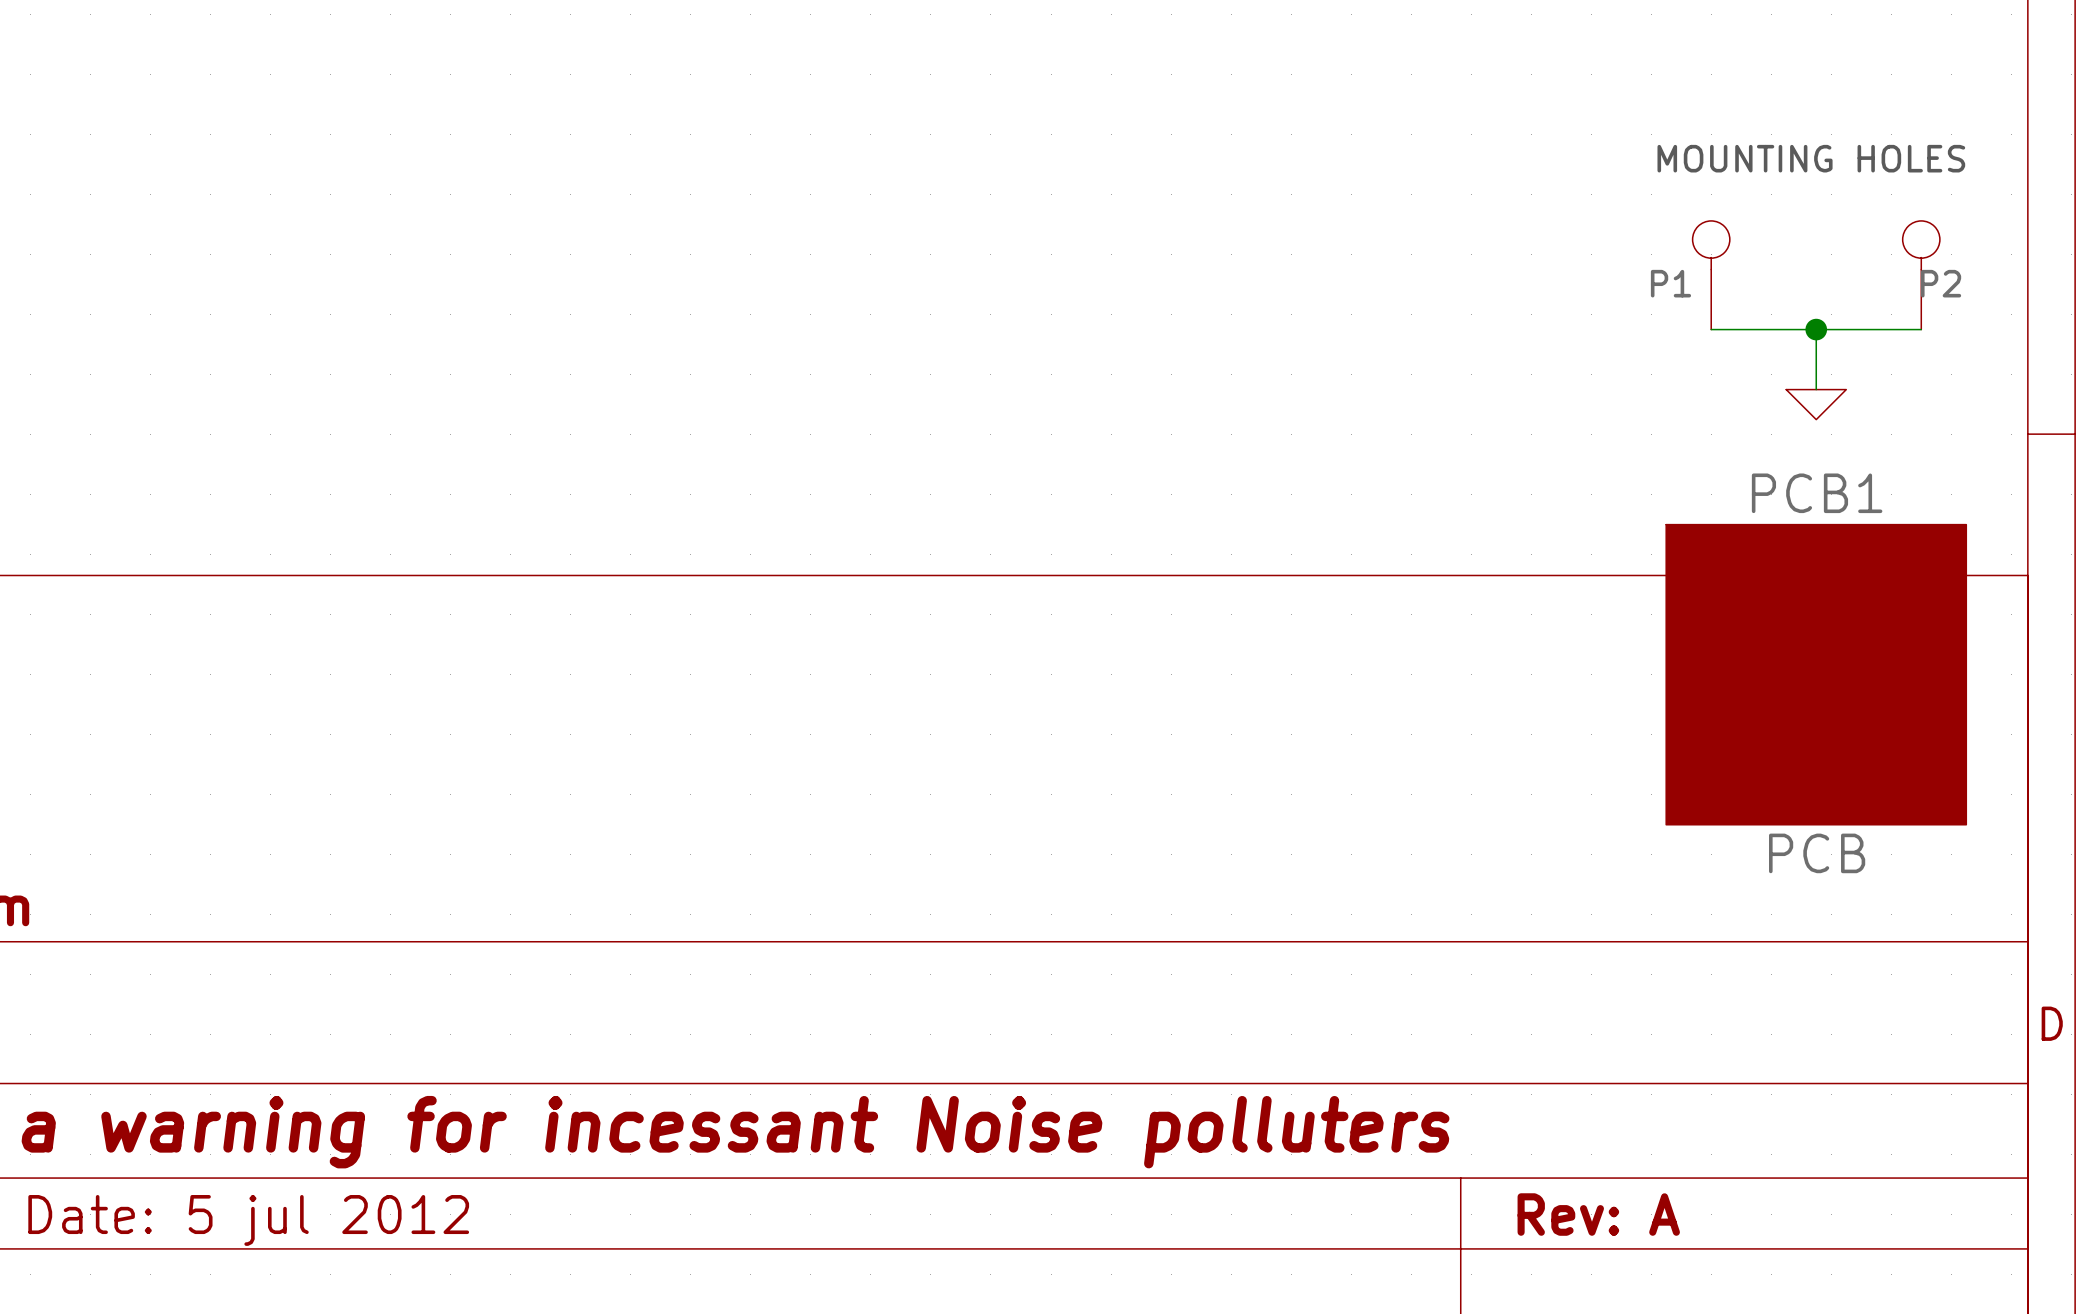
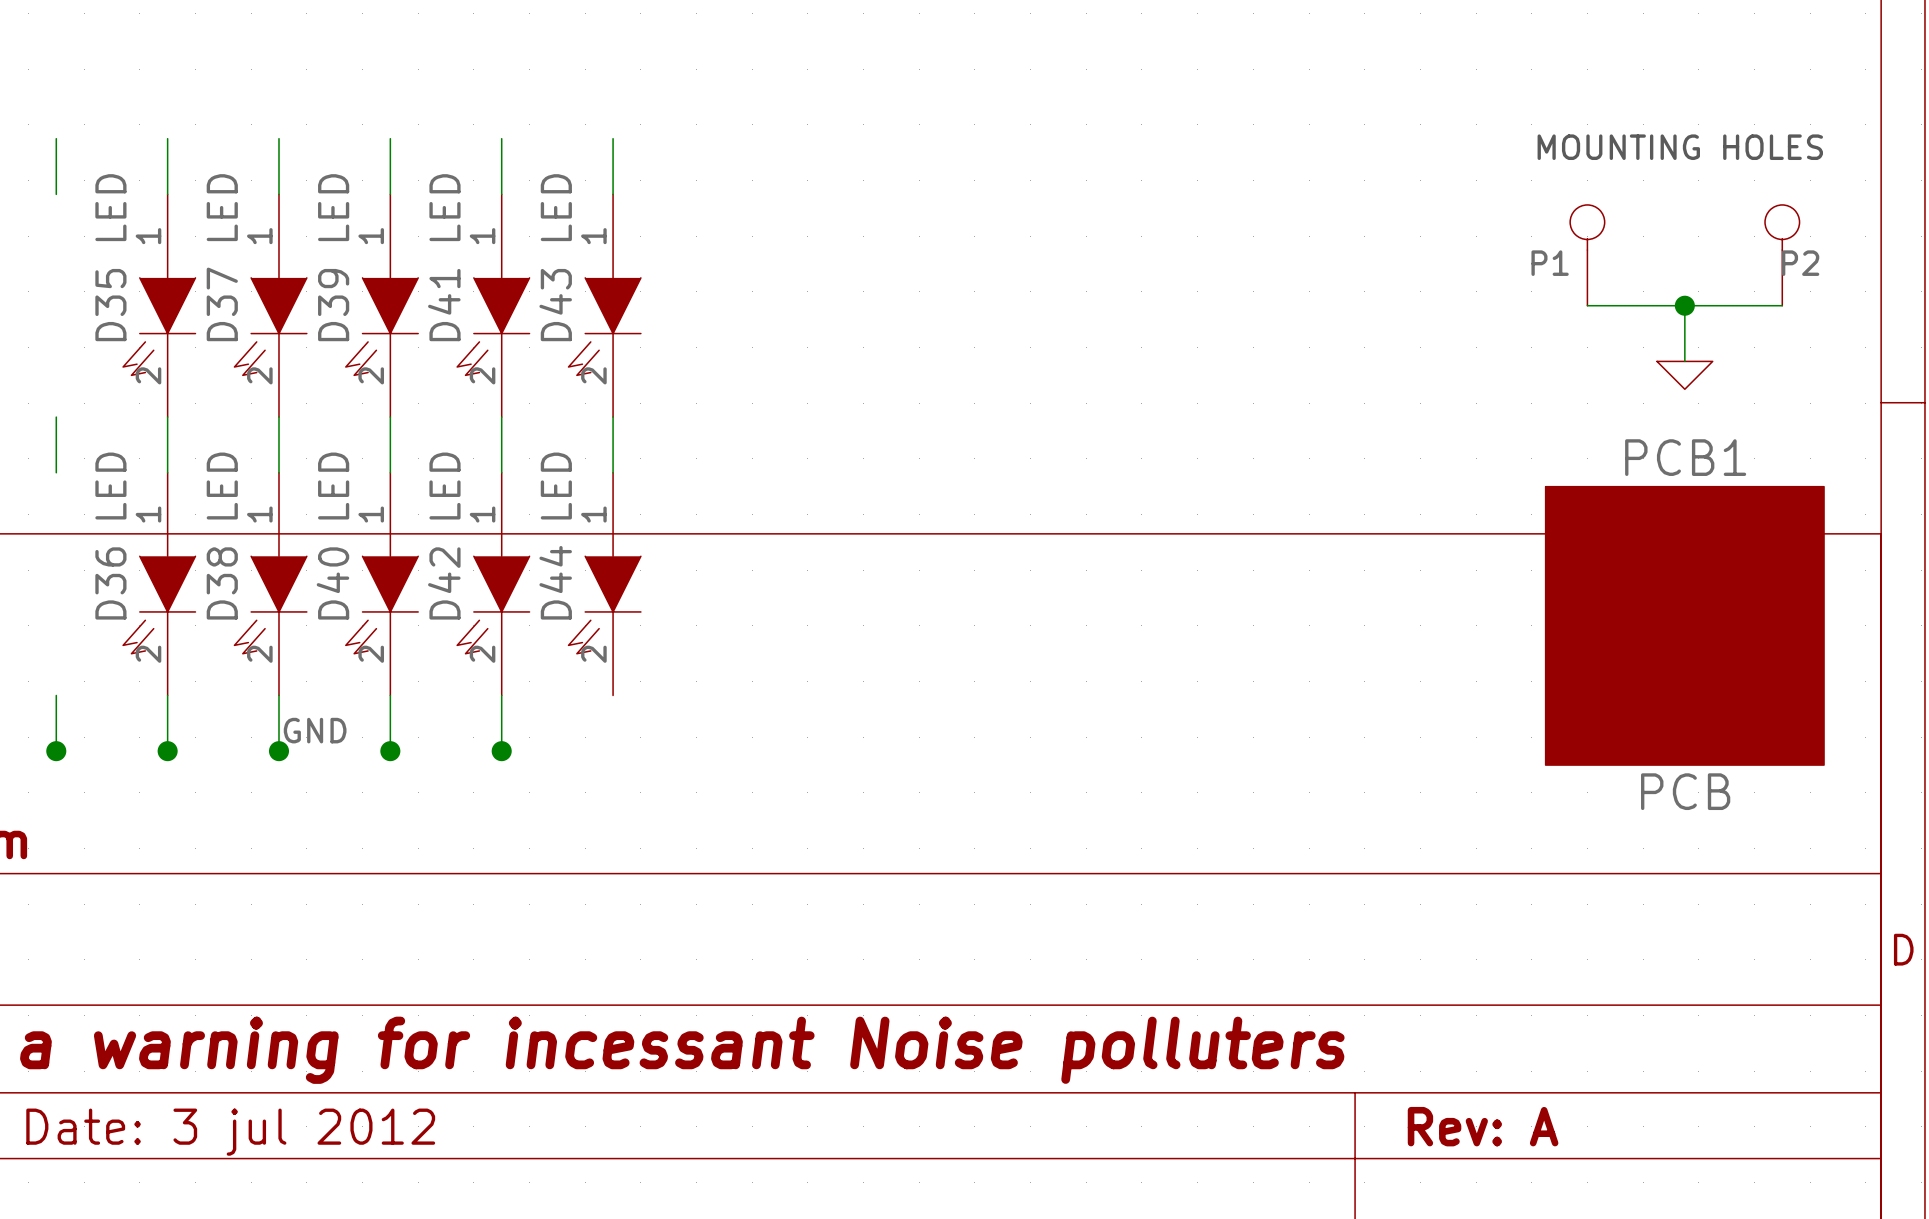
wire: none -> (56, 138) (56, 194)
wire: none -> (167, 138) (167, 194)
wire: none -> (278, 138) (278, 194)
wire: none -> (390, 138) (390, 194)
wire: none -> (501, 138) (501, 194)
wire: none -> (613, 138) (613, 194)
D35: none -> LED (159, 305)
D37: none -> LED (270, 305)
D39: none -> LED (381, 305)
D41: none -> LED (493, 305)
D43: none -> LED (604, 305)
wire: none -> (56, 417) (56, 472)
wire: none -> (167, 417) (167, 472)
wire: none -> (278, 417) (278, 472)
wire: none -> (390, 417) (390, 472)
wire: none -> (501, 417) (501, 472)
wire: none -> (613, 417) (613, 472)
D36: none -> LED (159, 584)
D38: none -> LED (270, 584)
D40: none -> LED (381, 584)
D42: none -> LED (493, 584)
D44: none -> LED (604, 584)
wire: none -> (56, 695) (56, 751)
wire: none -> (167, 695) (167, 751)
wire: none -> (278, 695) (278, 751)
wire: none -> (390, 695) (390, 751)
wire: none -> (501, 695) (501, 751)
label: none -> GND (315, 730)
junction: none -> (56, 751)
junction: none -> (167, 751)
junction: none -> (278, 751)
junction: none -> (390, 751)
junction: none -> (501, 751)
title block: Date: 5 jul 2012 (248, 1220) -> Date: 3 jul 2012 (230, 1132)

